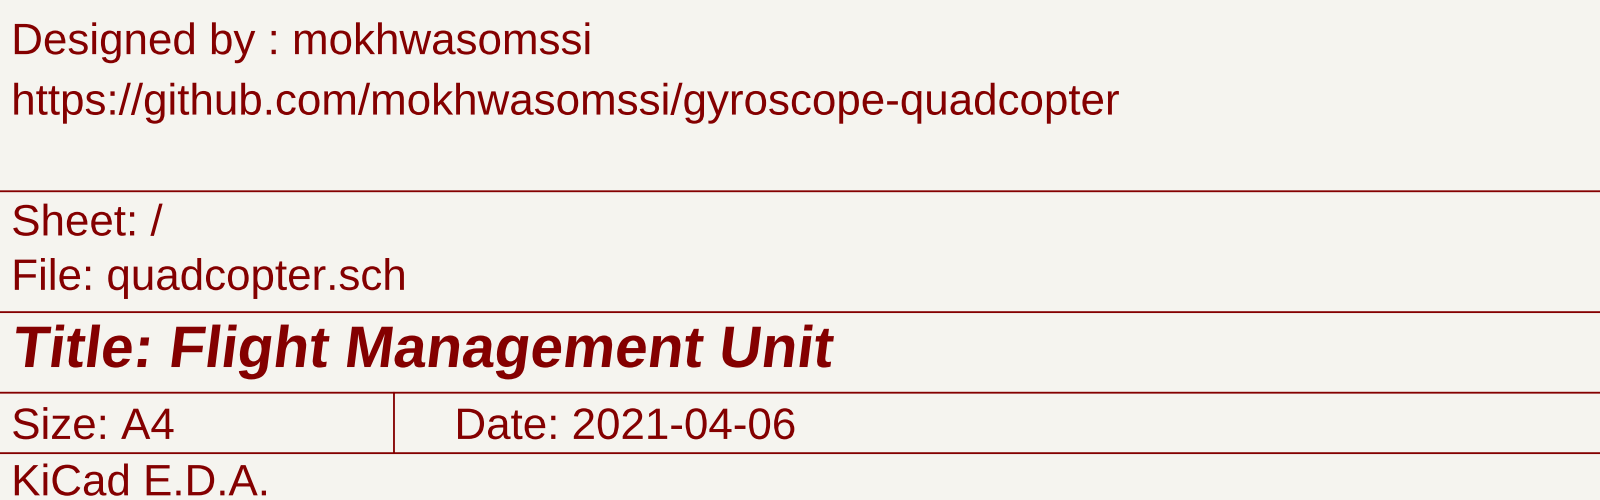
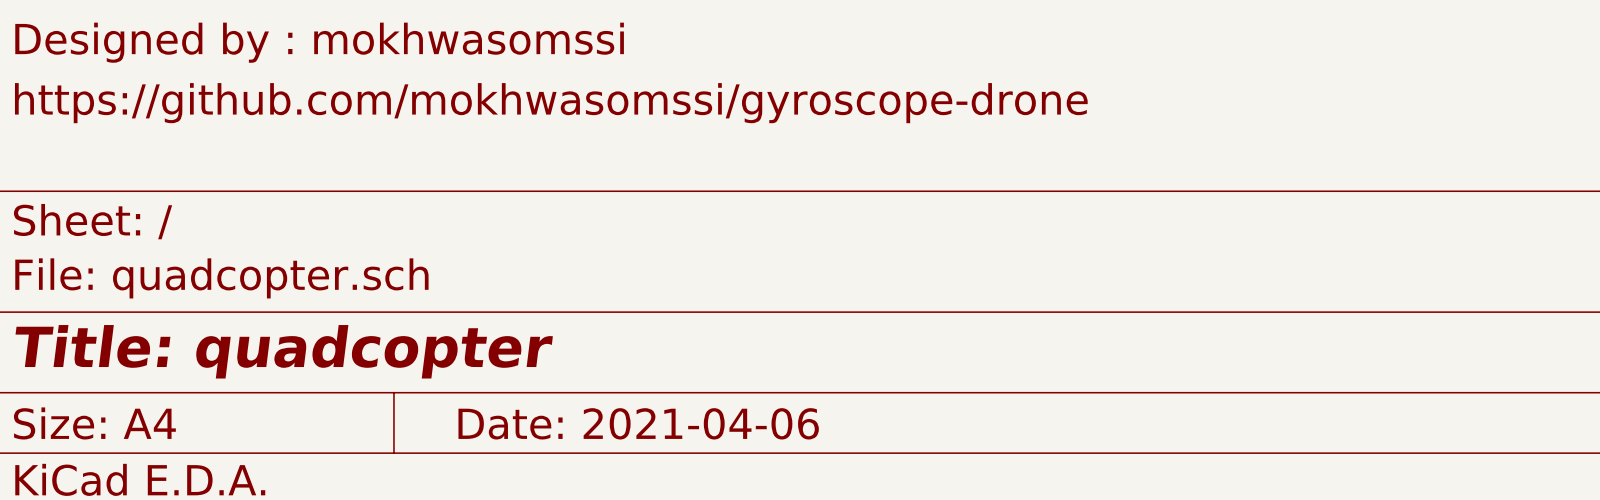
title block: https://github.com/mokhwasomssi/gyroscope-quadcopter (566, 103) -> https://github.com/mokhwasomssi/gyroscope-drone (551, 103)
title block: Title: Flight Management Unit (425, 352) -> Title: quadcopter (284, 351)

